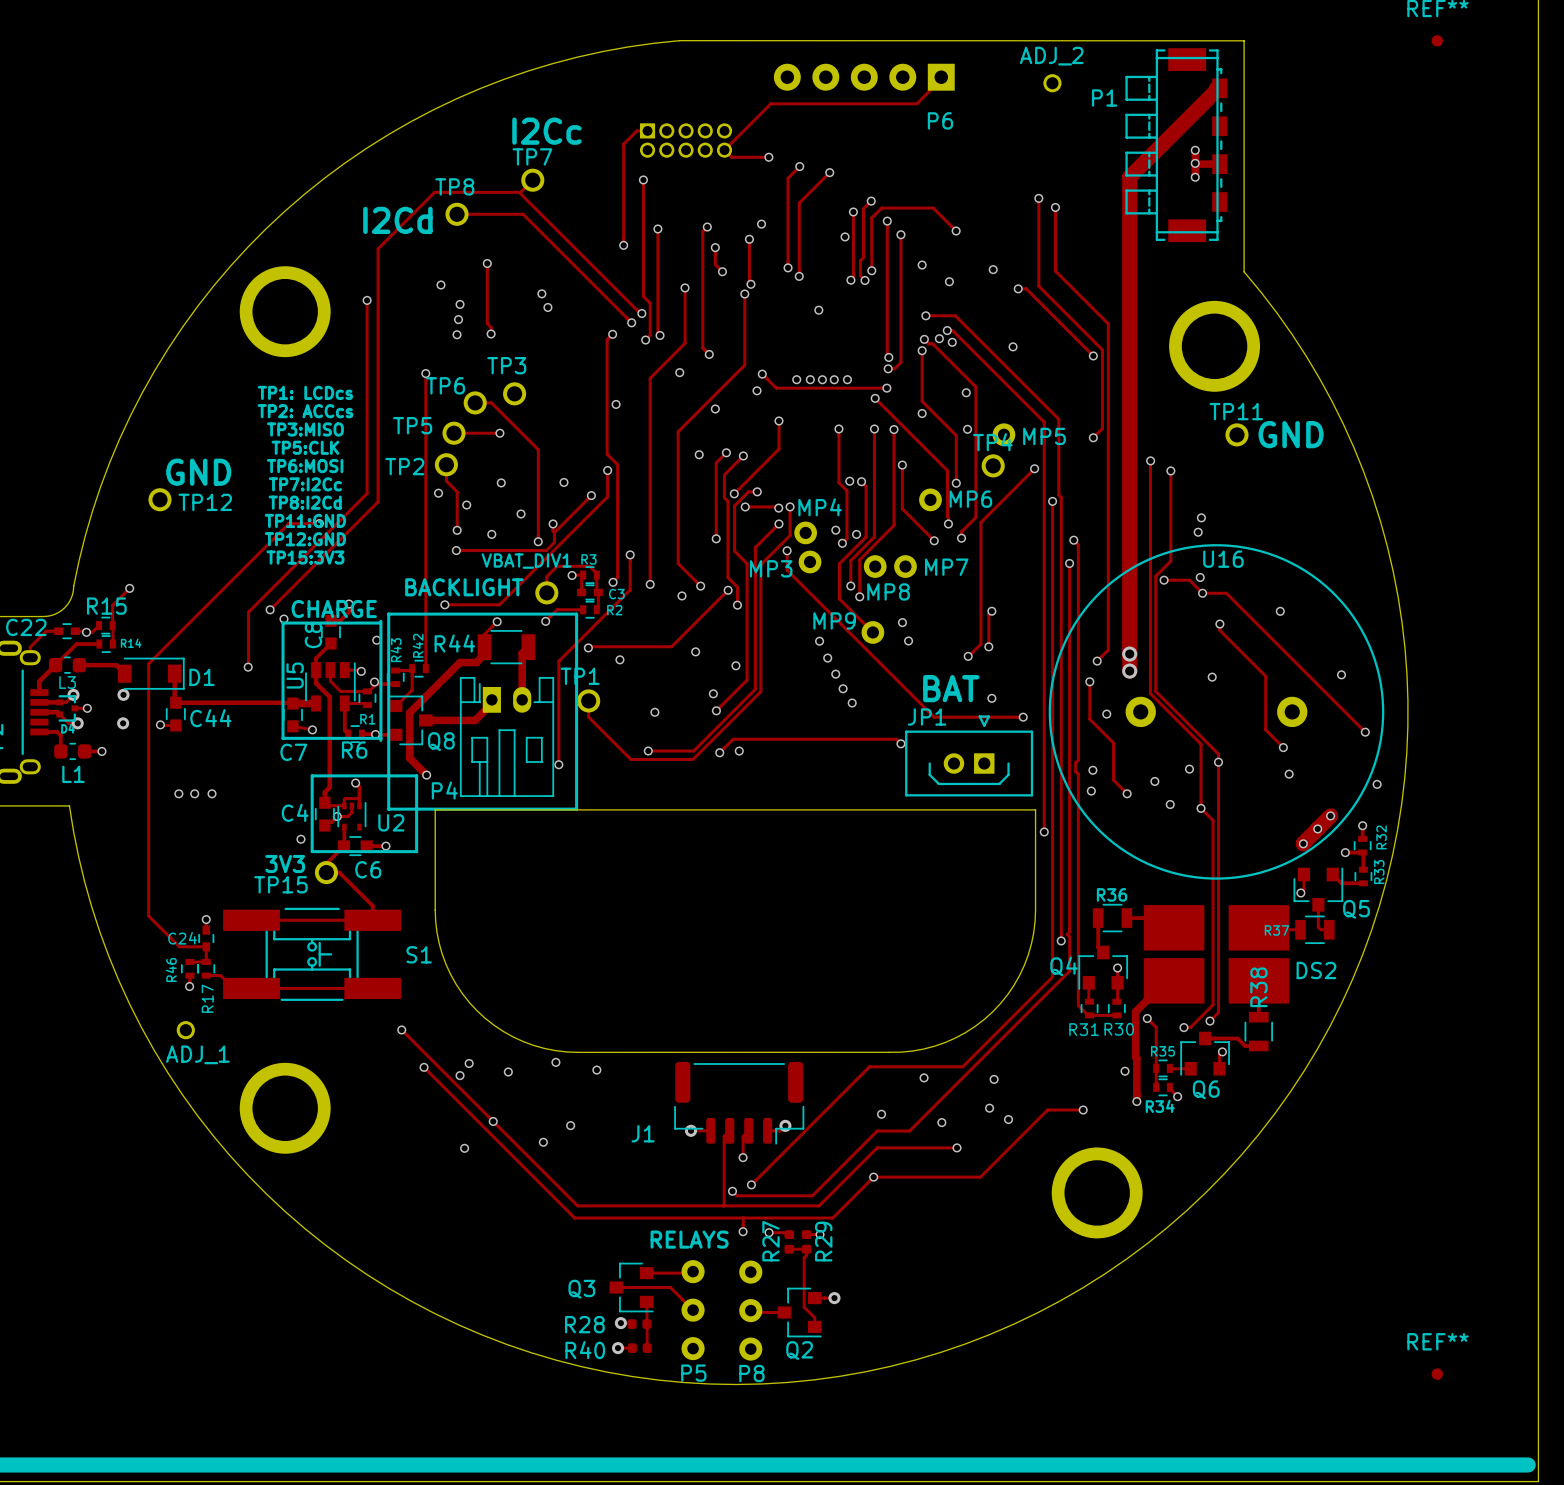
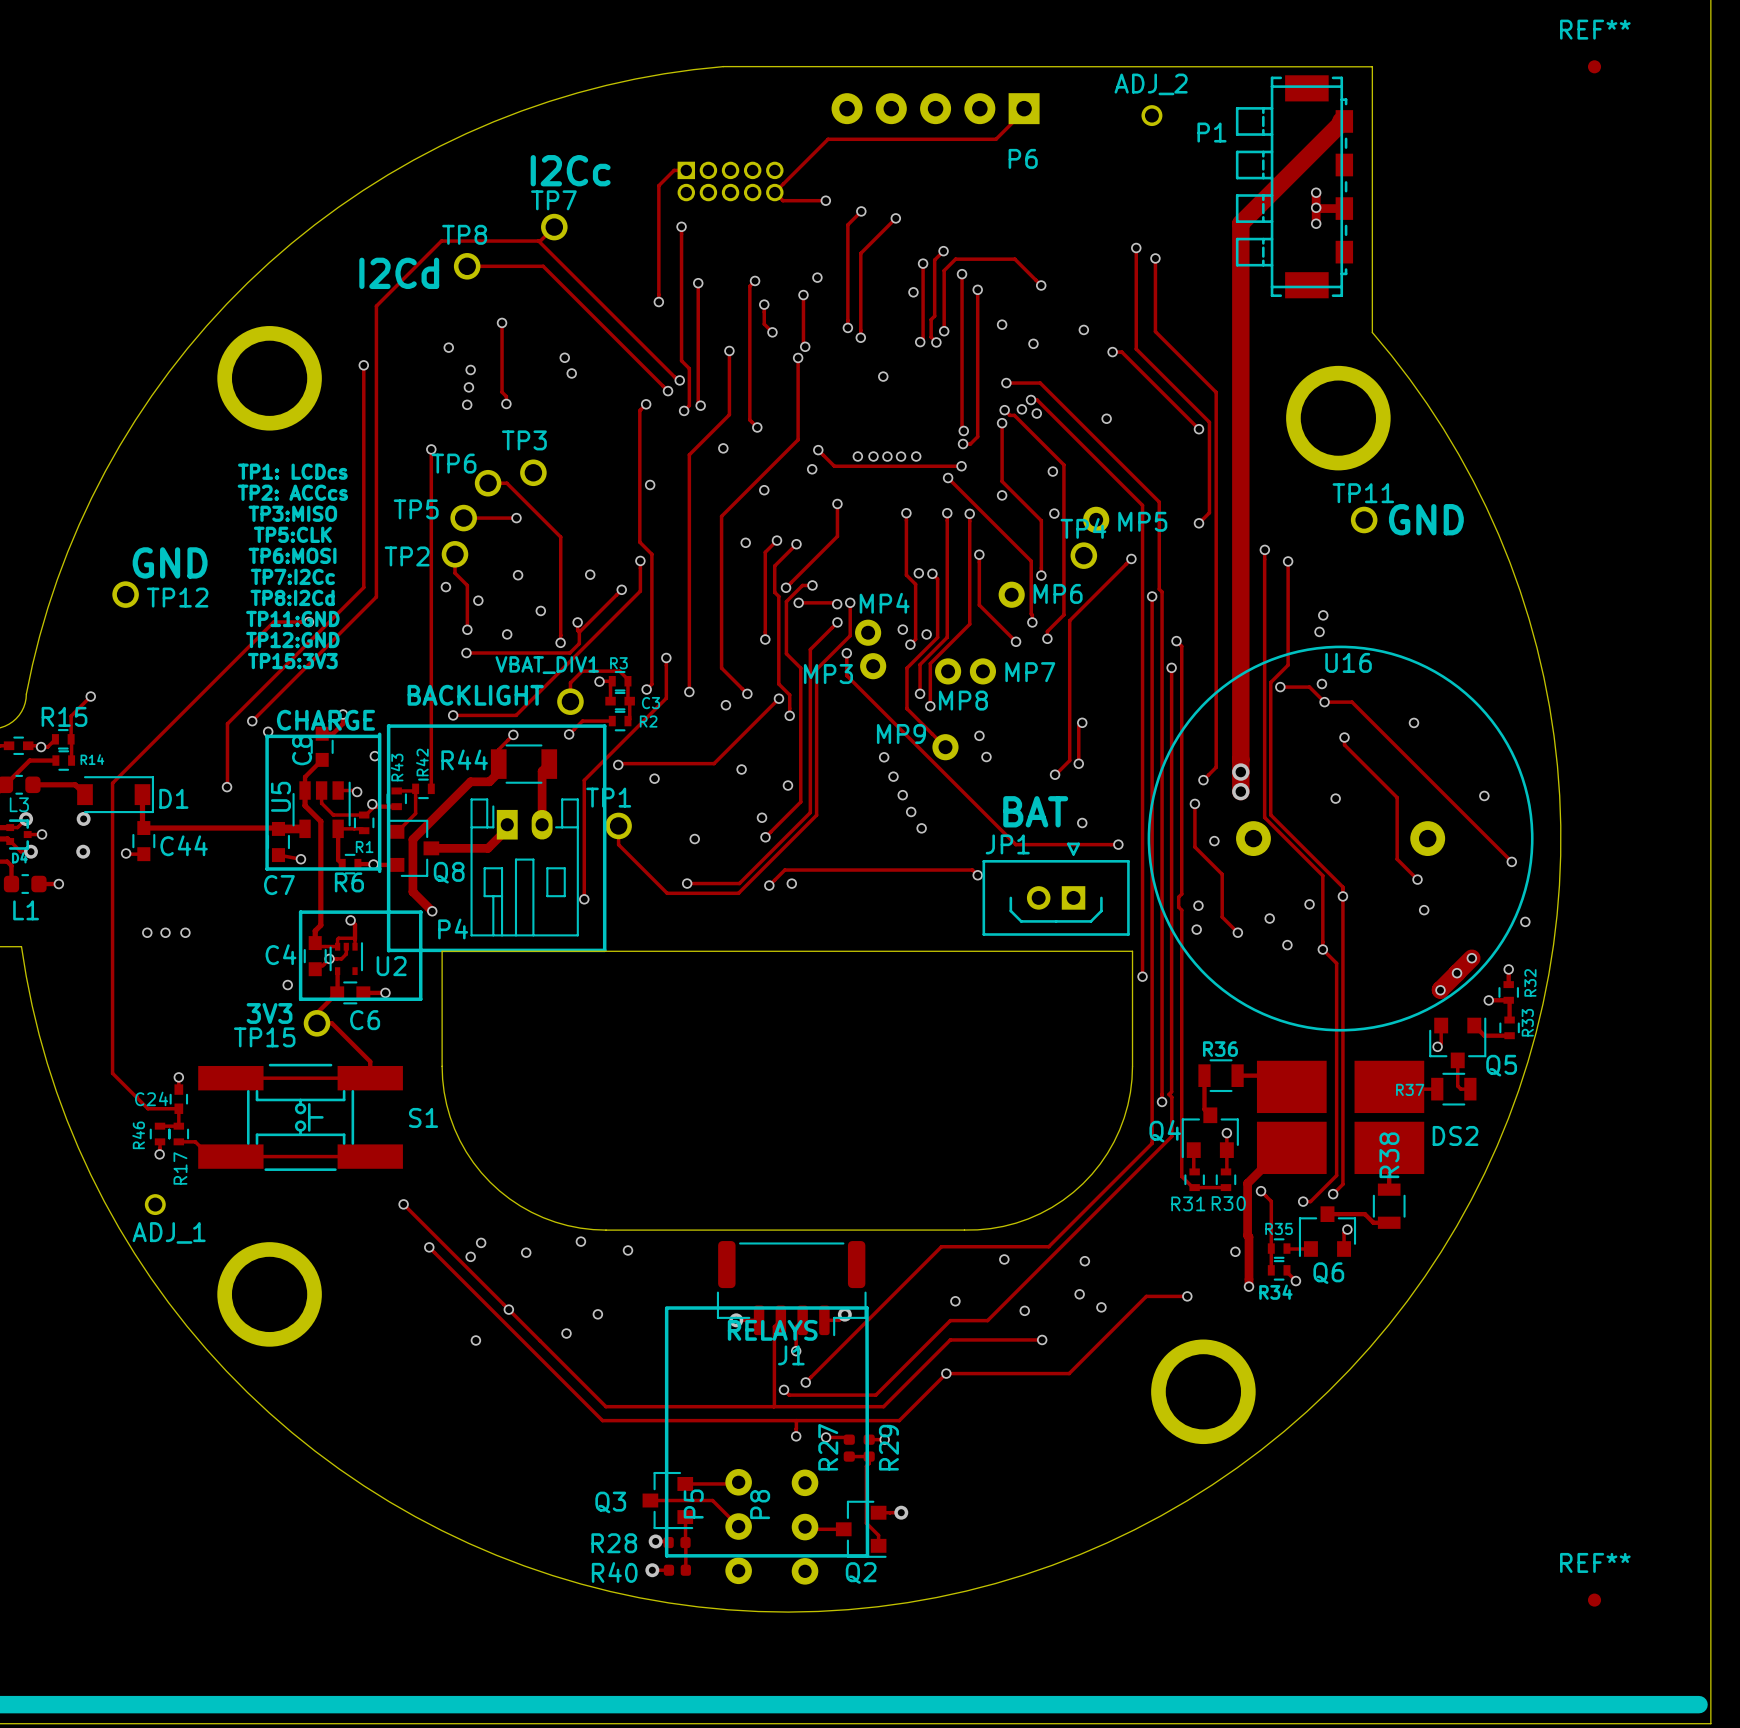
line: none -> (666, 1308) (866, 1308) (867, 1555) (666, 1555) (666, 1308)
J1 name position: J1 (643, 1133) -> J1 (791, 1355)
text position: RELAYS (689, 1239) -> RELAYS (772, 1330)
P5 name rotation: 0° (693, 1373) -> 90° counterclockwise (693, 1504)
P5 name position: P5 (693, 1373) -> P5 (693, 1504)
P8 name rotation: 0° (751, 1373) -> 90° counterclockwise (760, 1504)
P8 name position: P8 (751, 1373) -> P8 (760, 1504)

